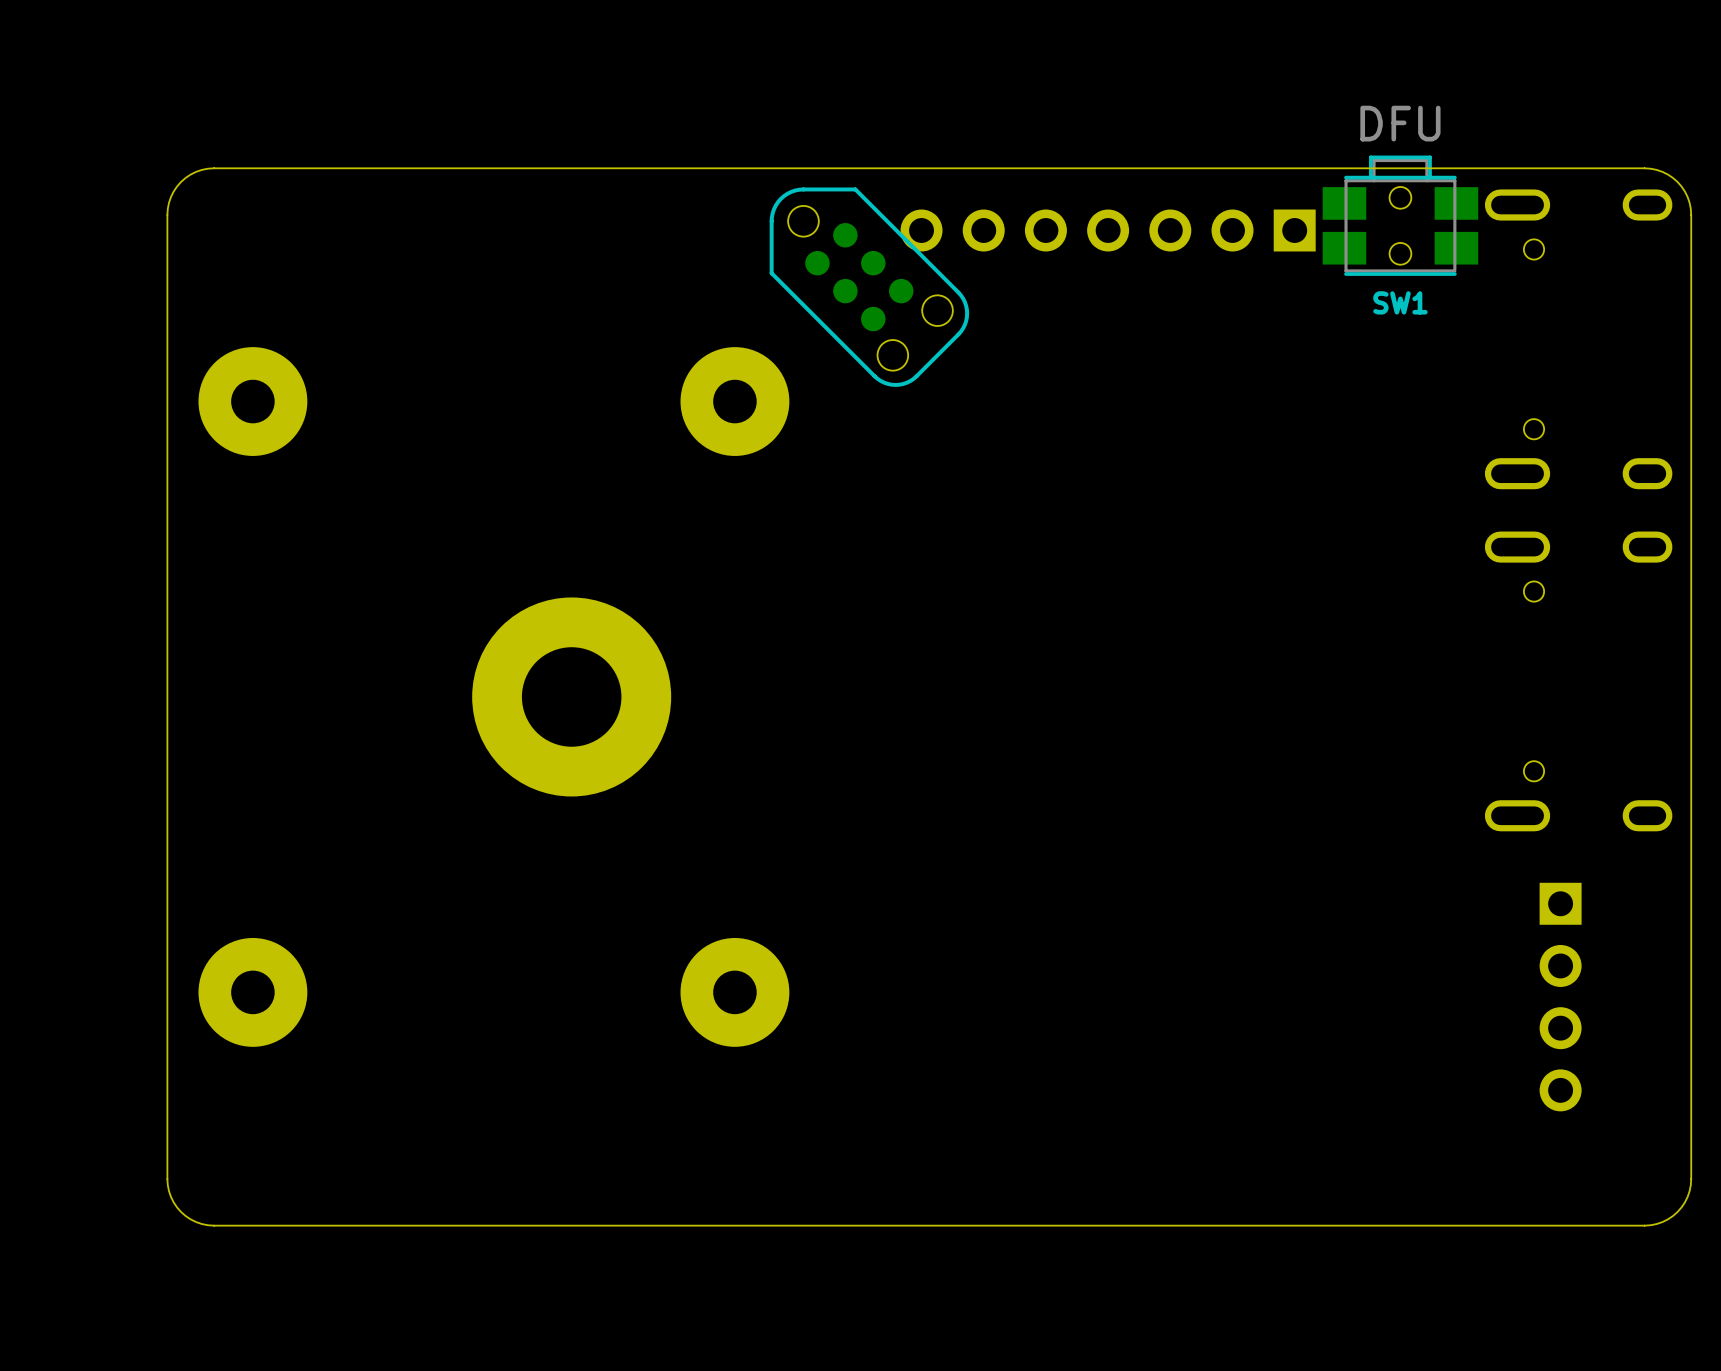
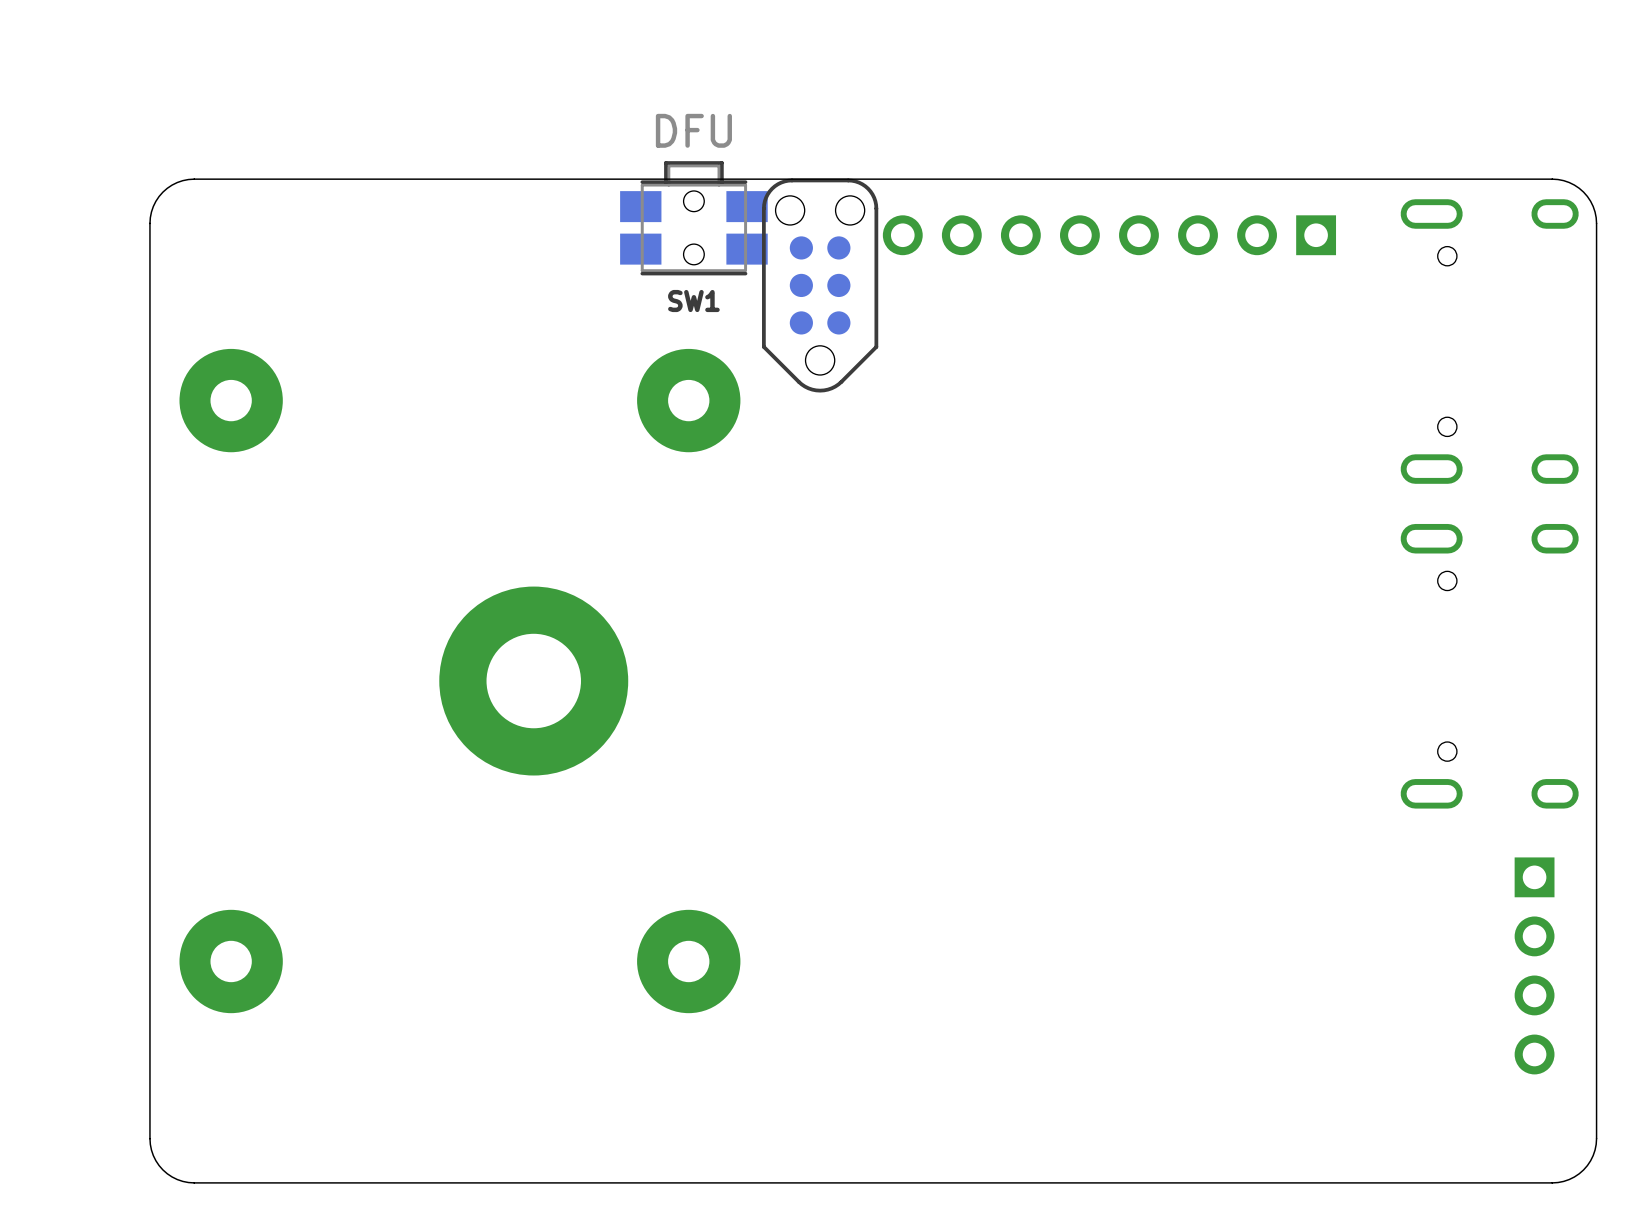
SW1 position: (1400, 215) -> (693, 218)
part: none -> (1109, 235)
part: (1108, 230) -> none
part rotation: 0° (869, 287) -> 135° counterclockwise (820, 285)
part position: (1560, 997) -> (1534, 965)

